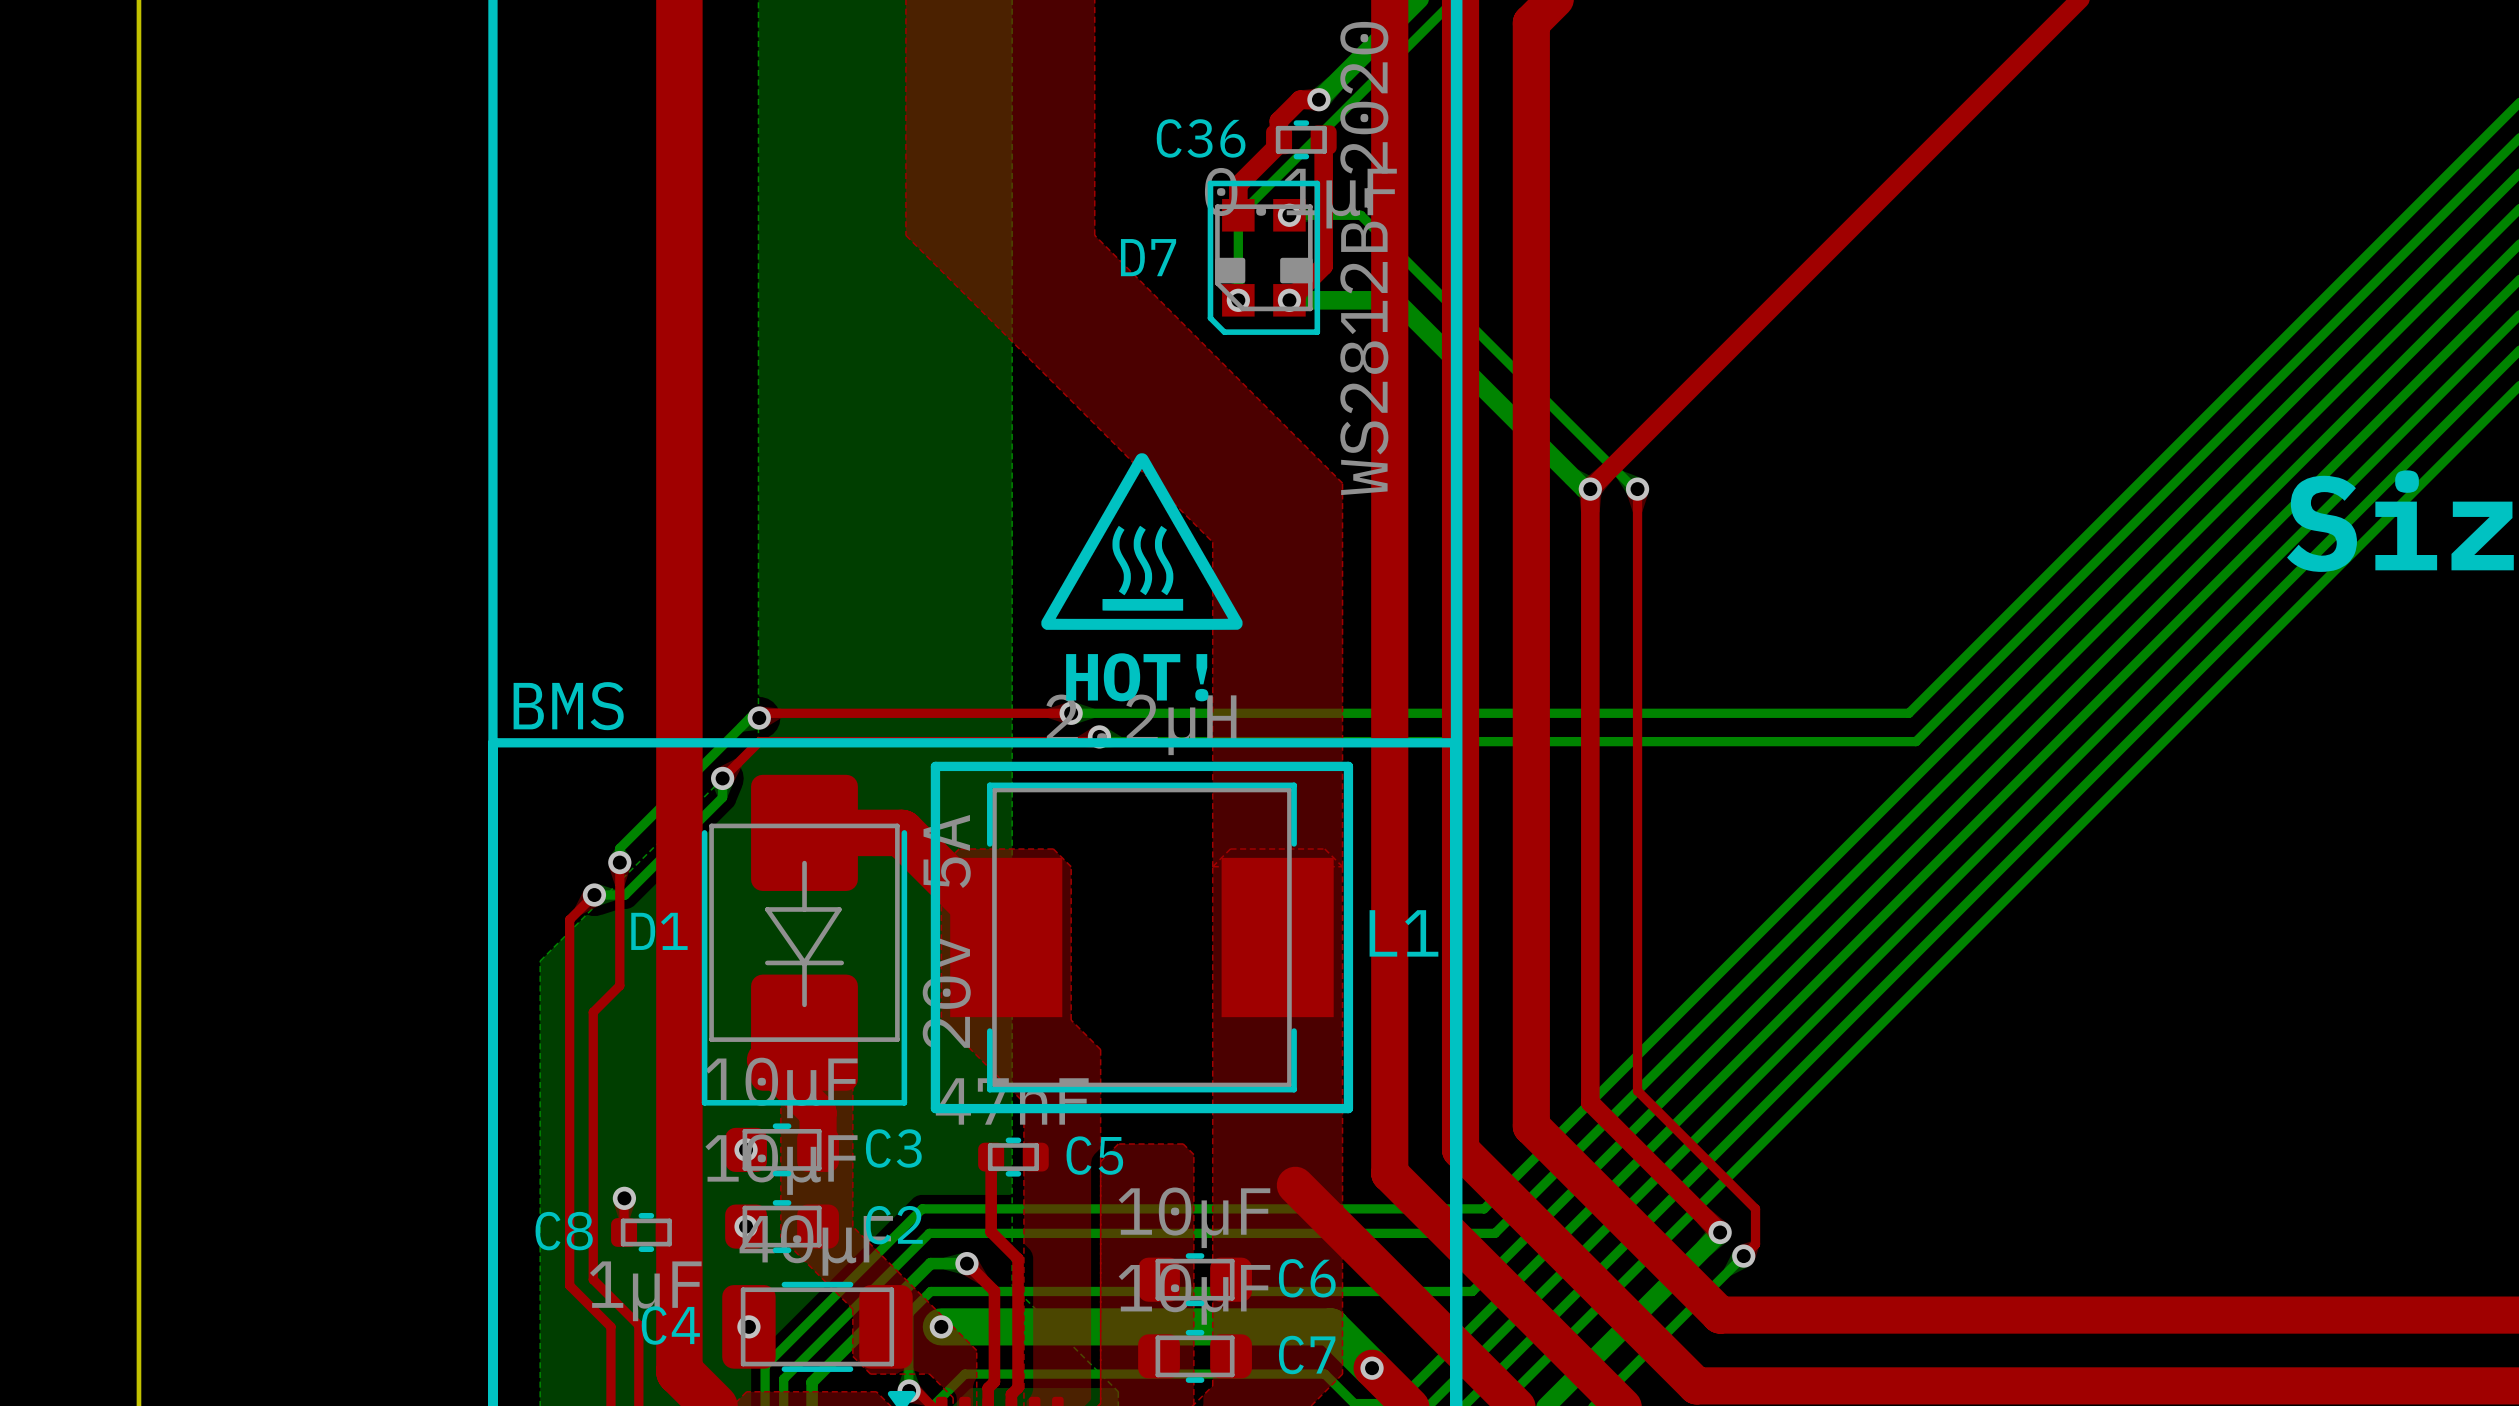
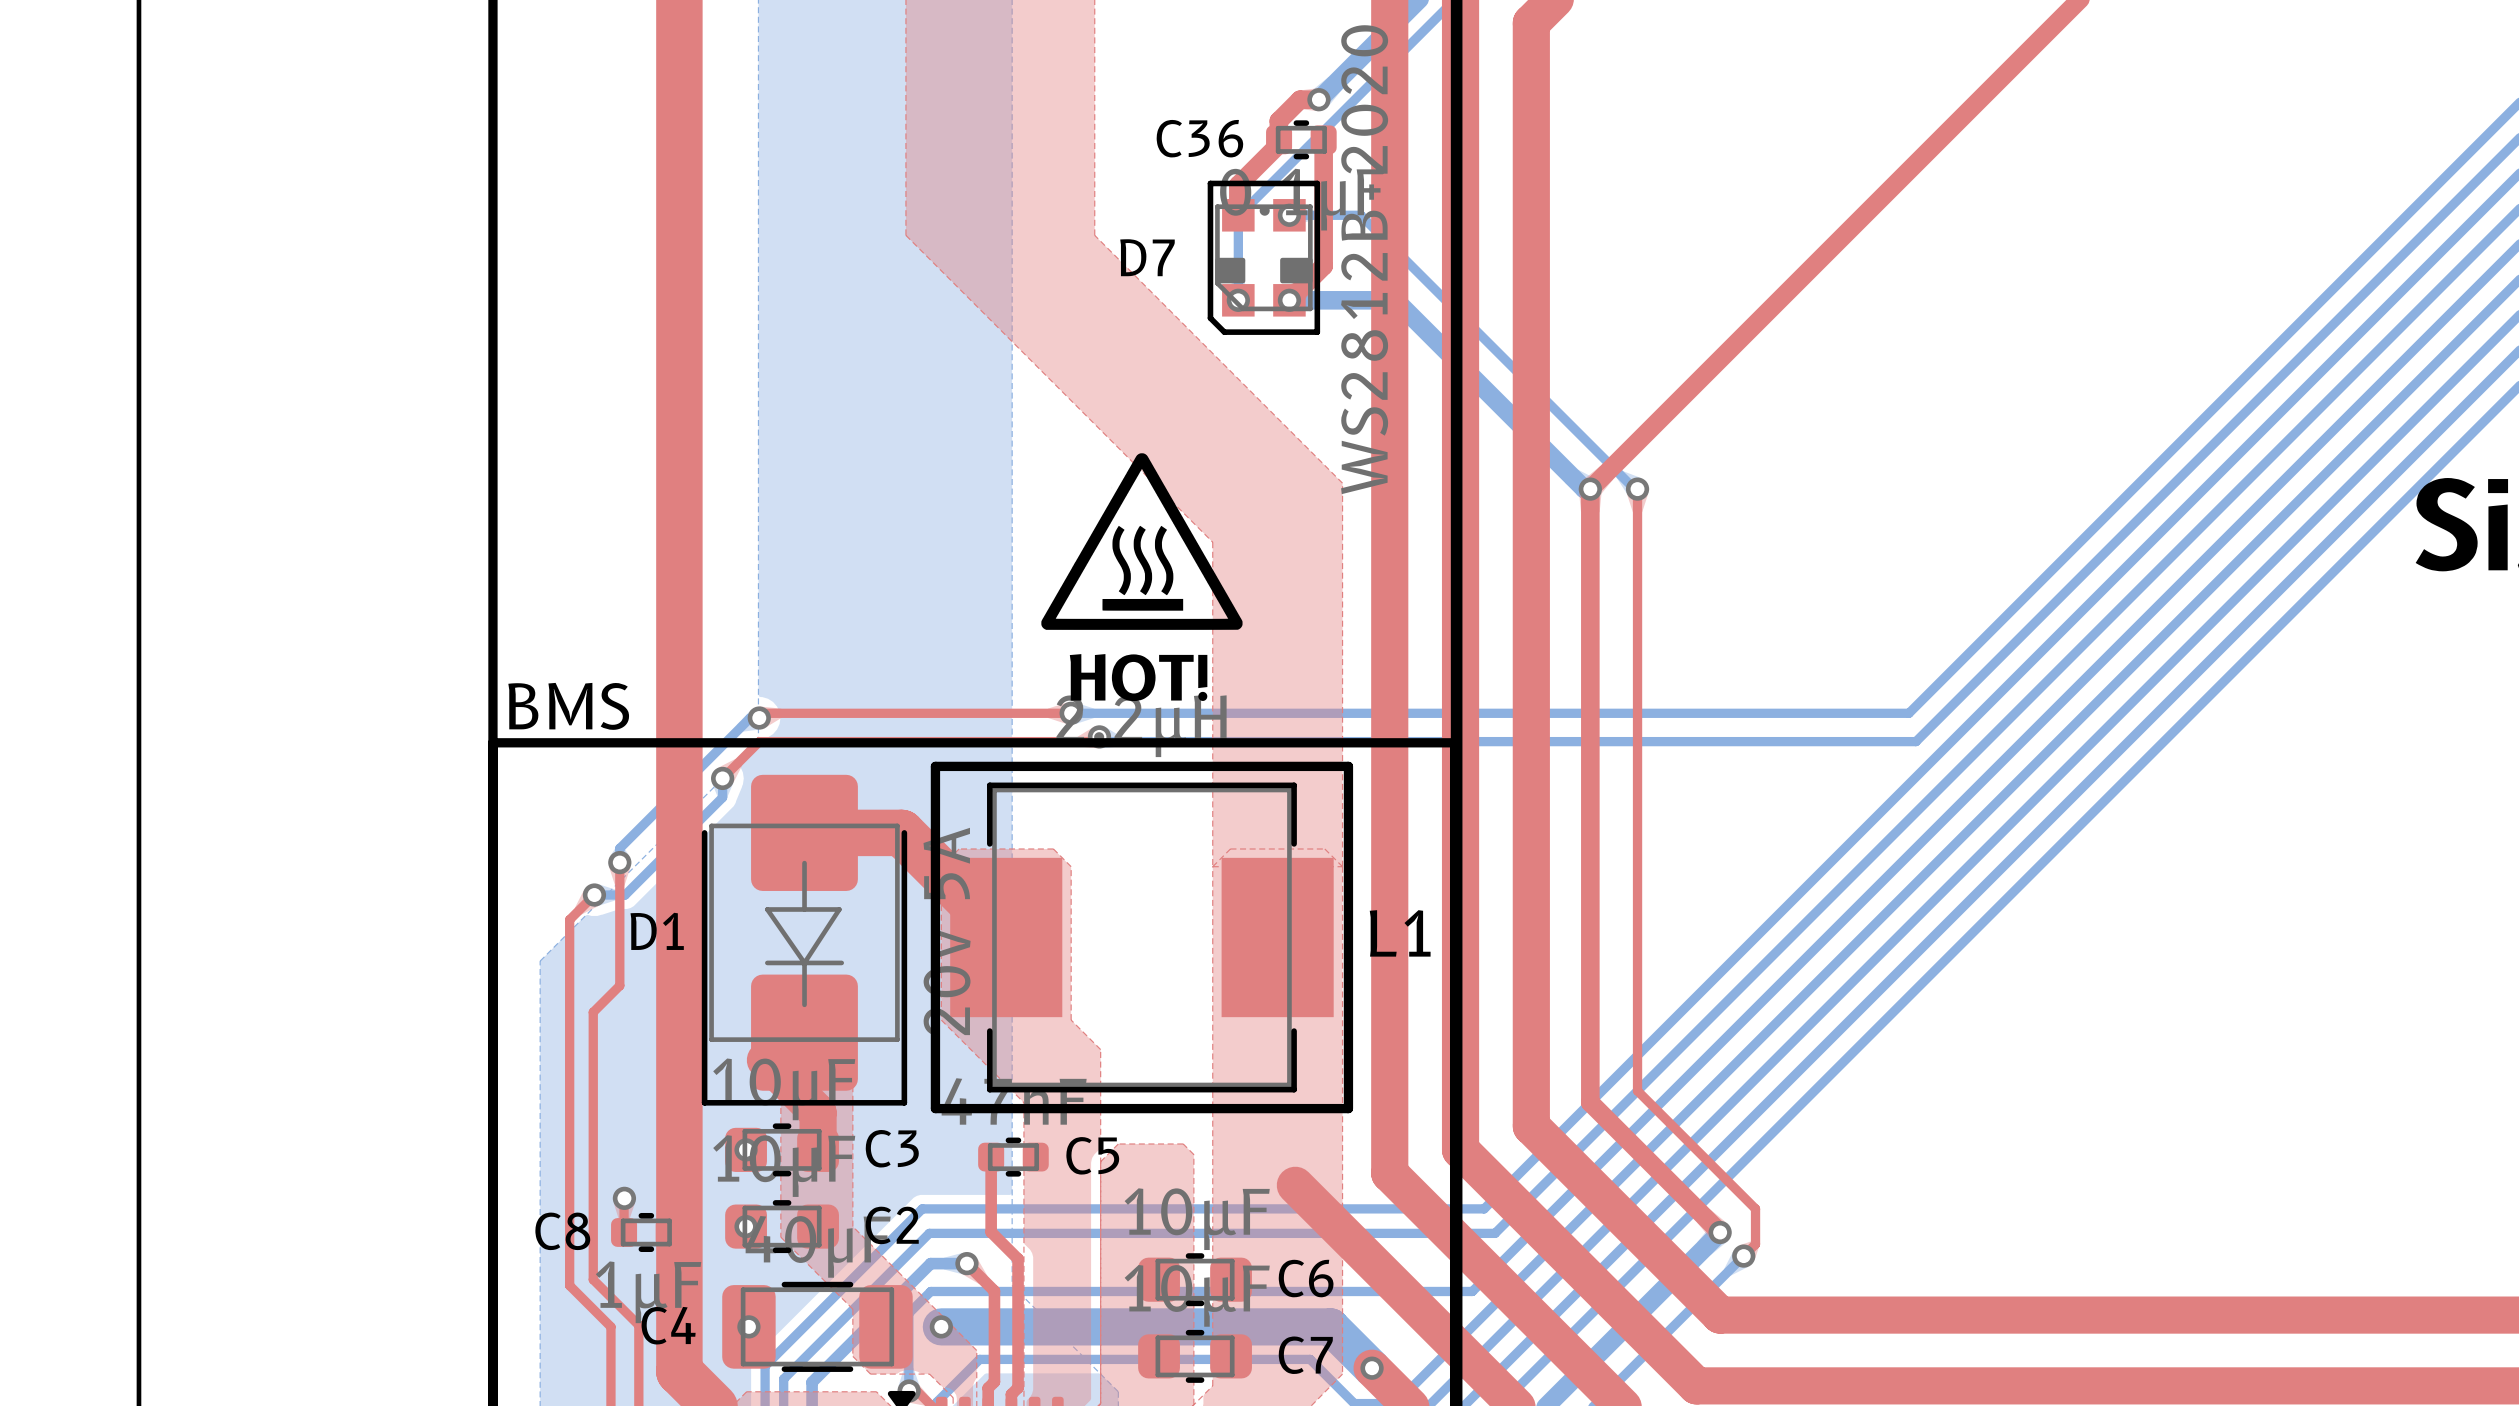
bottom track: (964, 1374) (1324, 1374) -> (964, 1374) (979, 1359) (1310, 1359) (1324, 1374)

